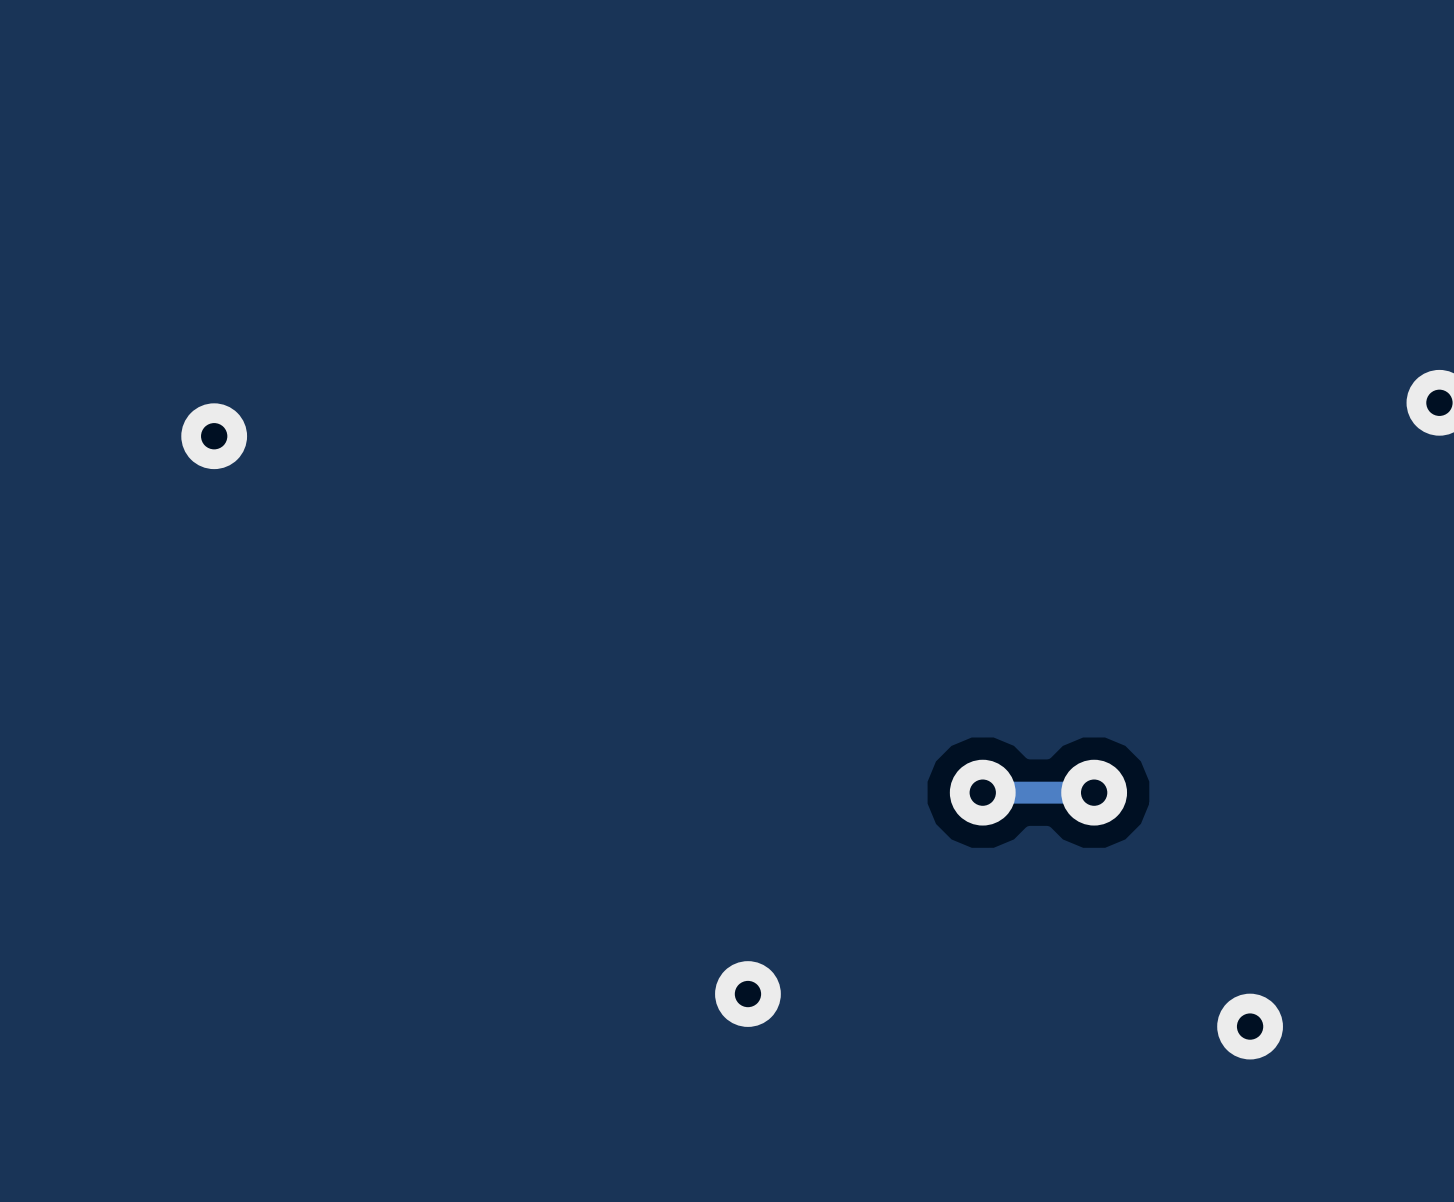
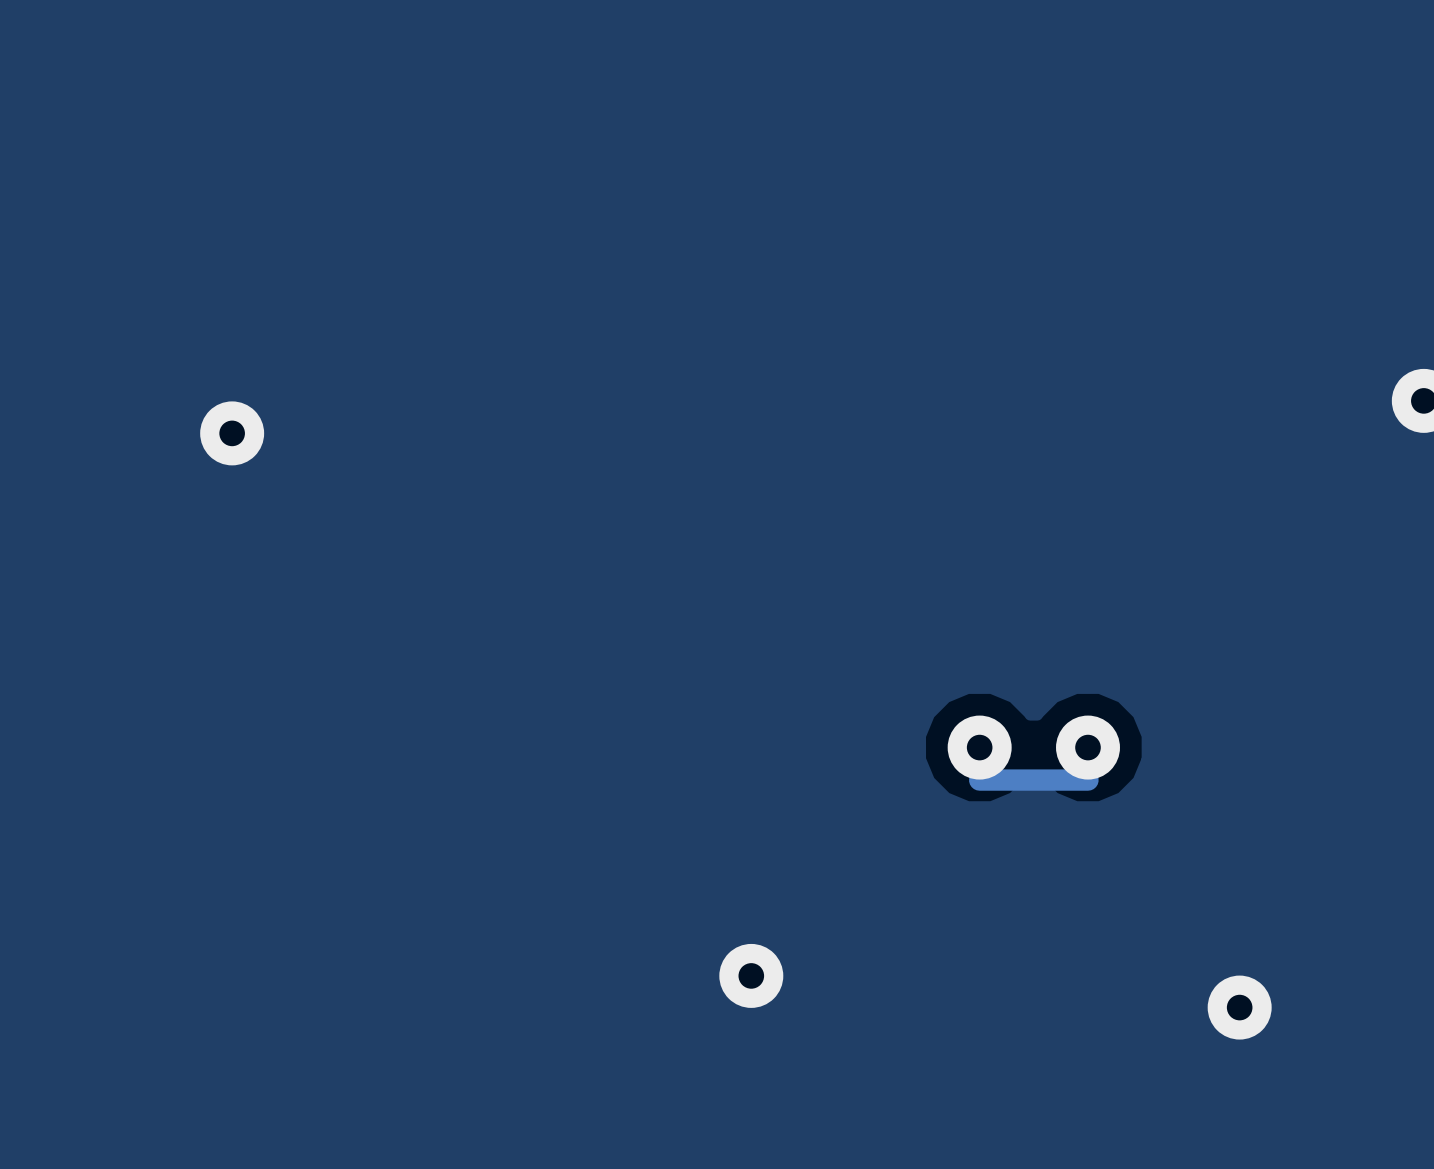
via position: (982, 792) -> (979, 747)
via position: (1094, 792) -> (1088, 747)

